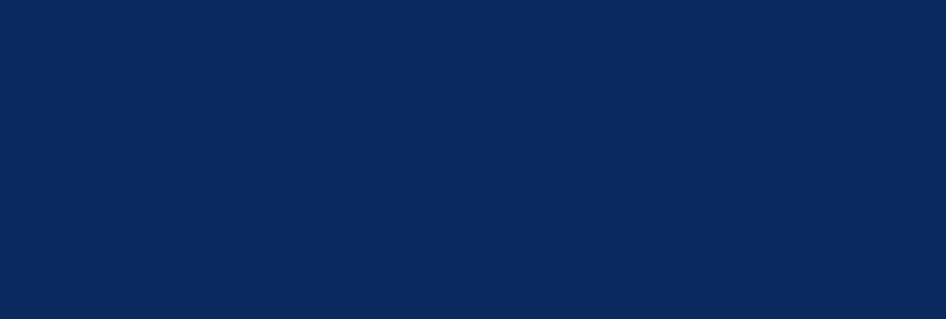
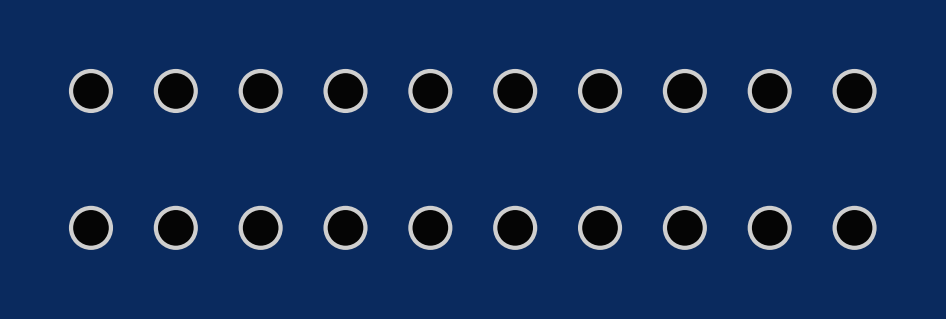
part: none -> (472, 90)
part: none -> (472, 227)

